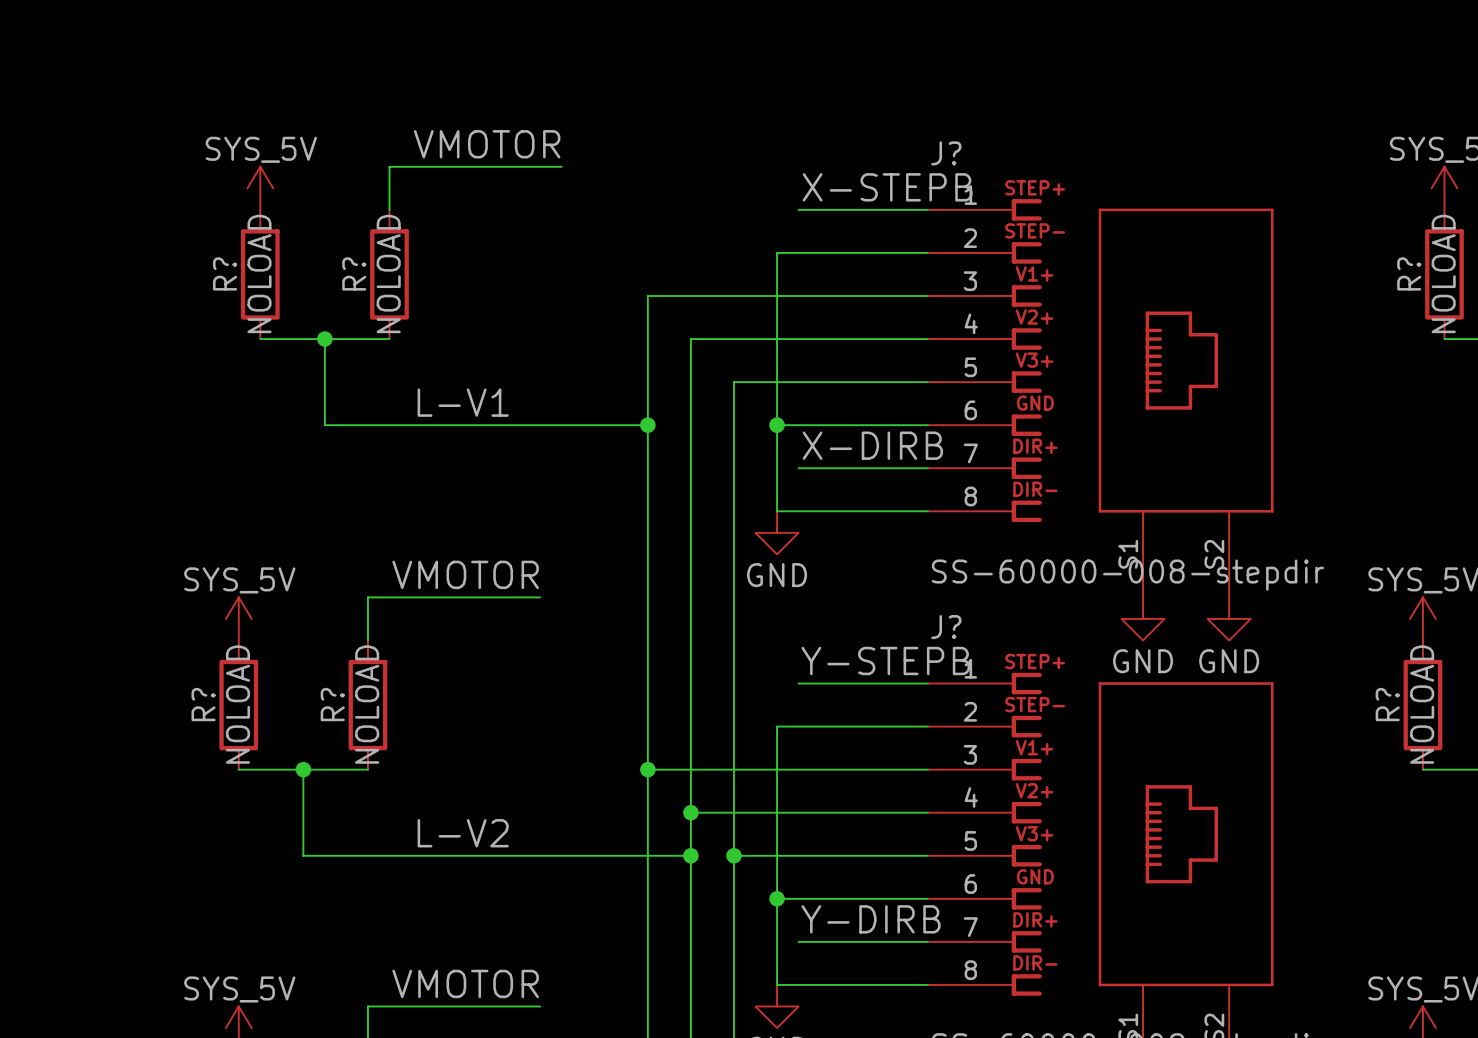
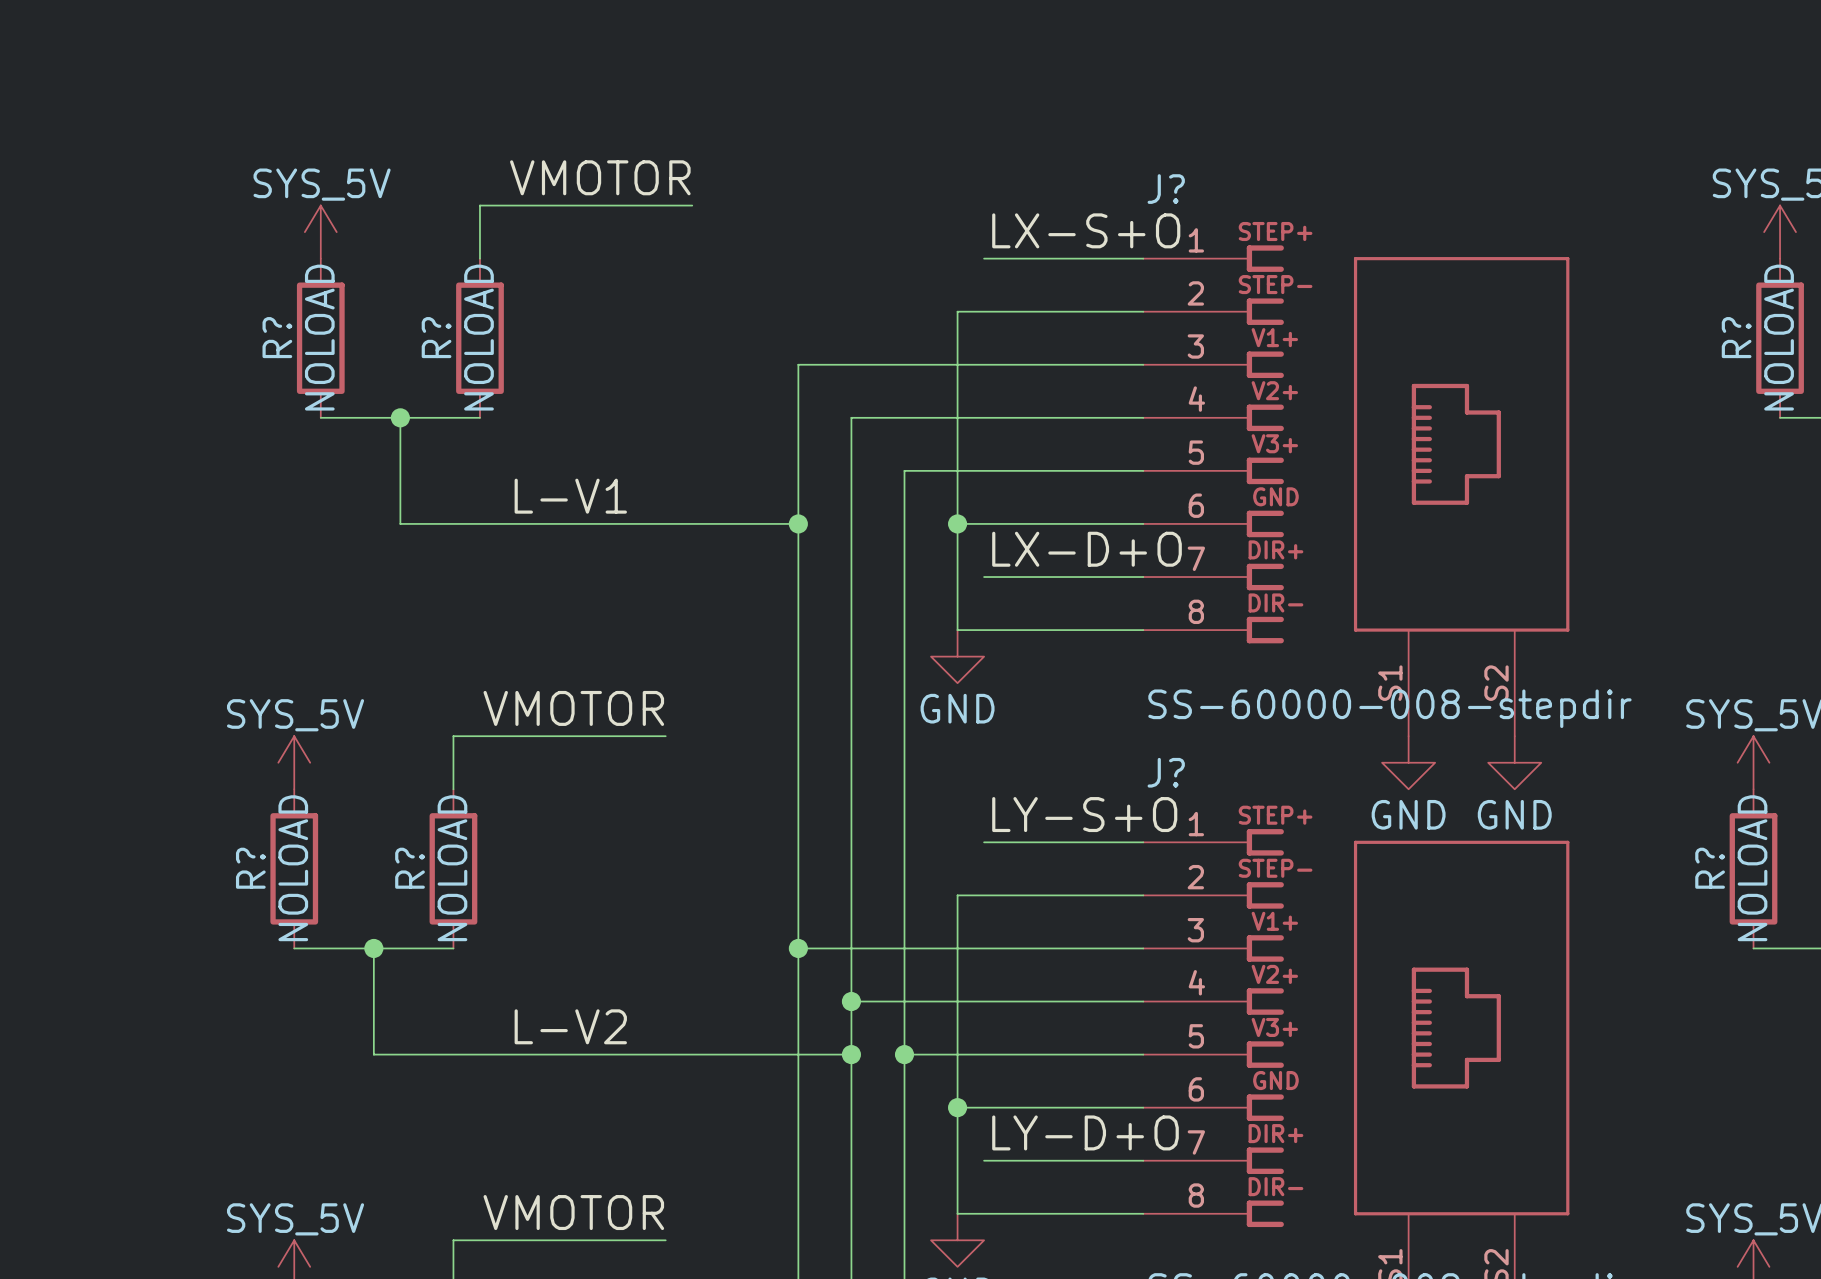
label: X-STEPB (887, 187) -> LX-S+O (1086, 230)
label: X-DIRB (872, 445) -> LX-D+O (1087, 549)
label: Y-STEPB (885, 660) -> LY-S+O (1084, 814)
label: Y-DIRB (871, 919) -> LY-D+O (1085, 1132)

